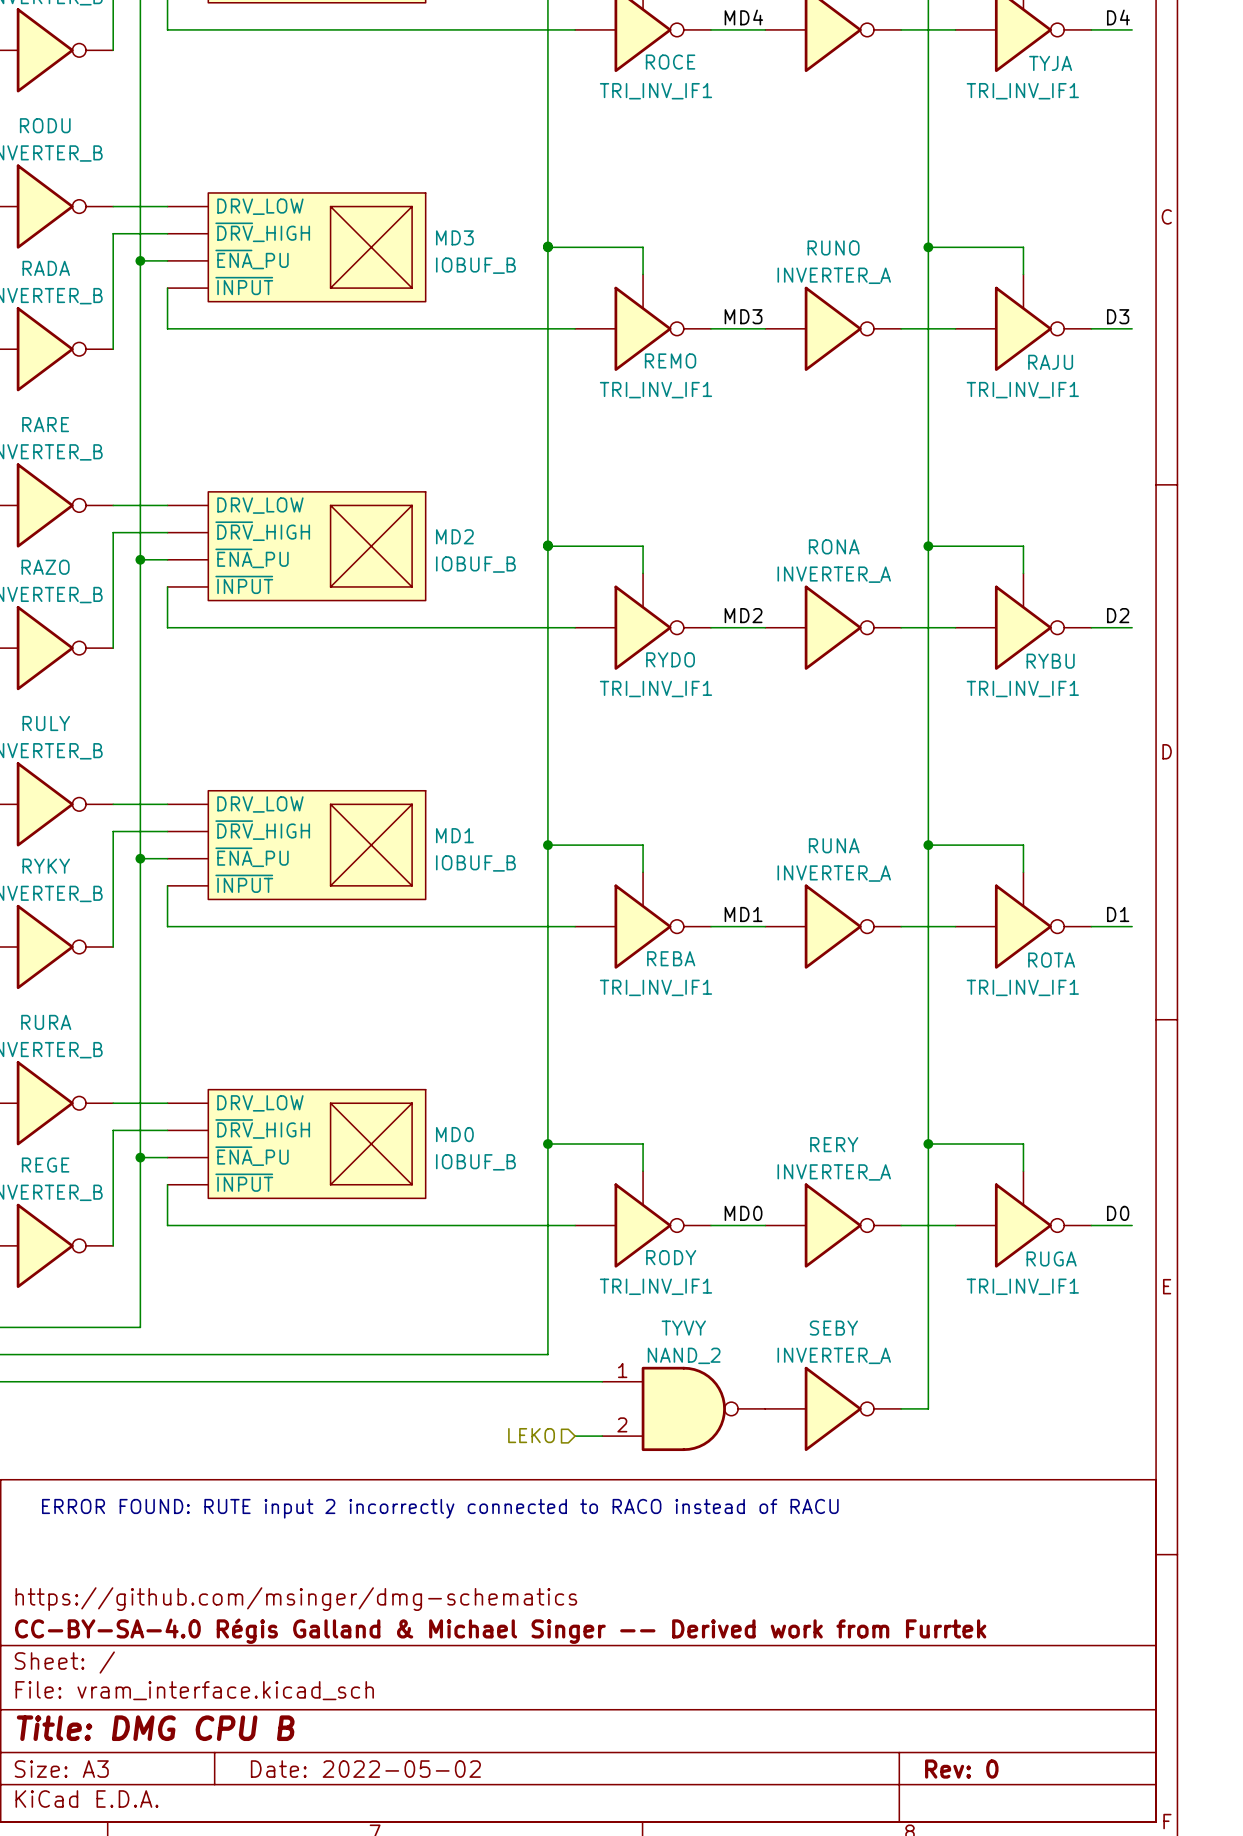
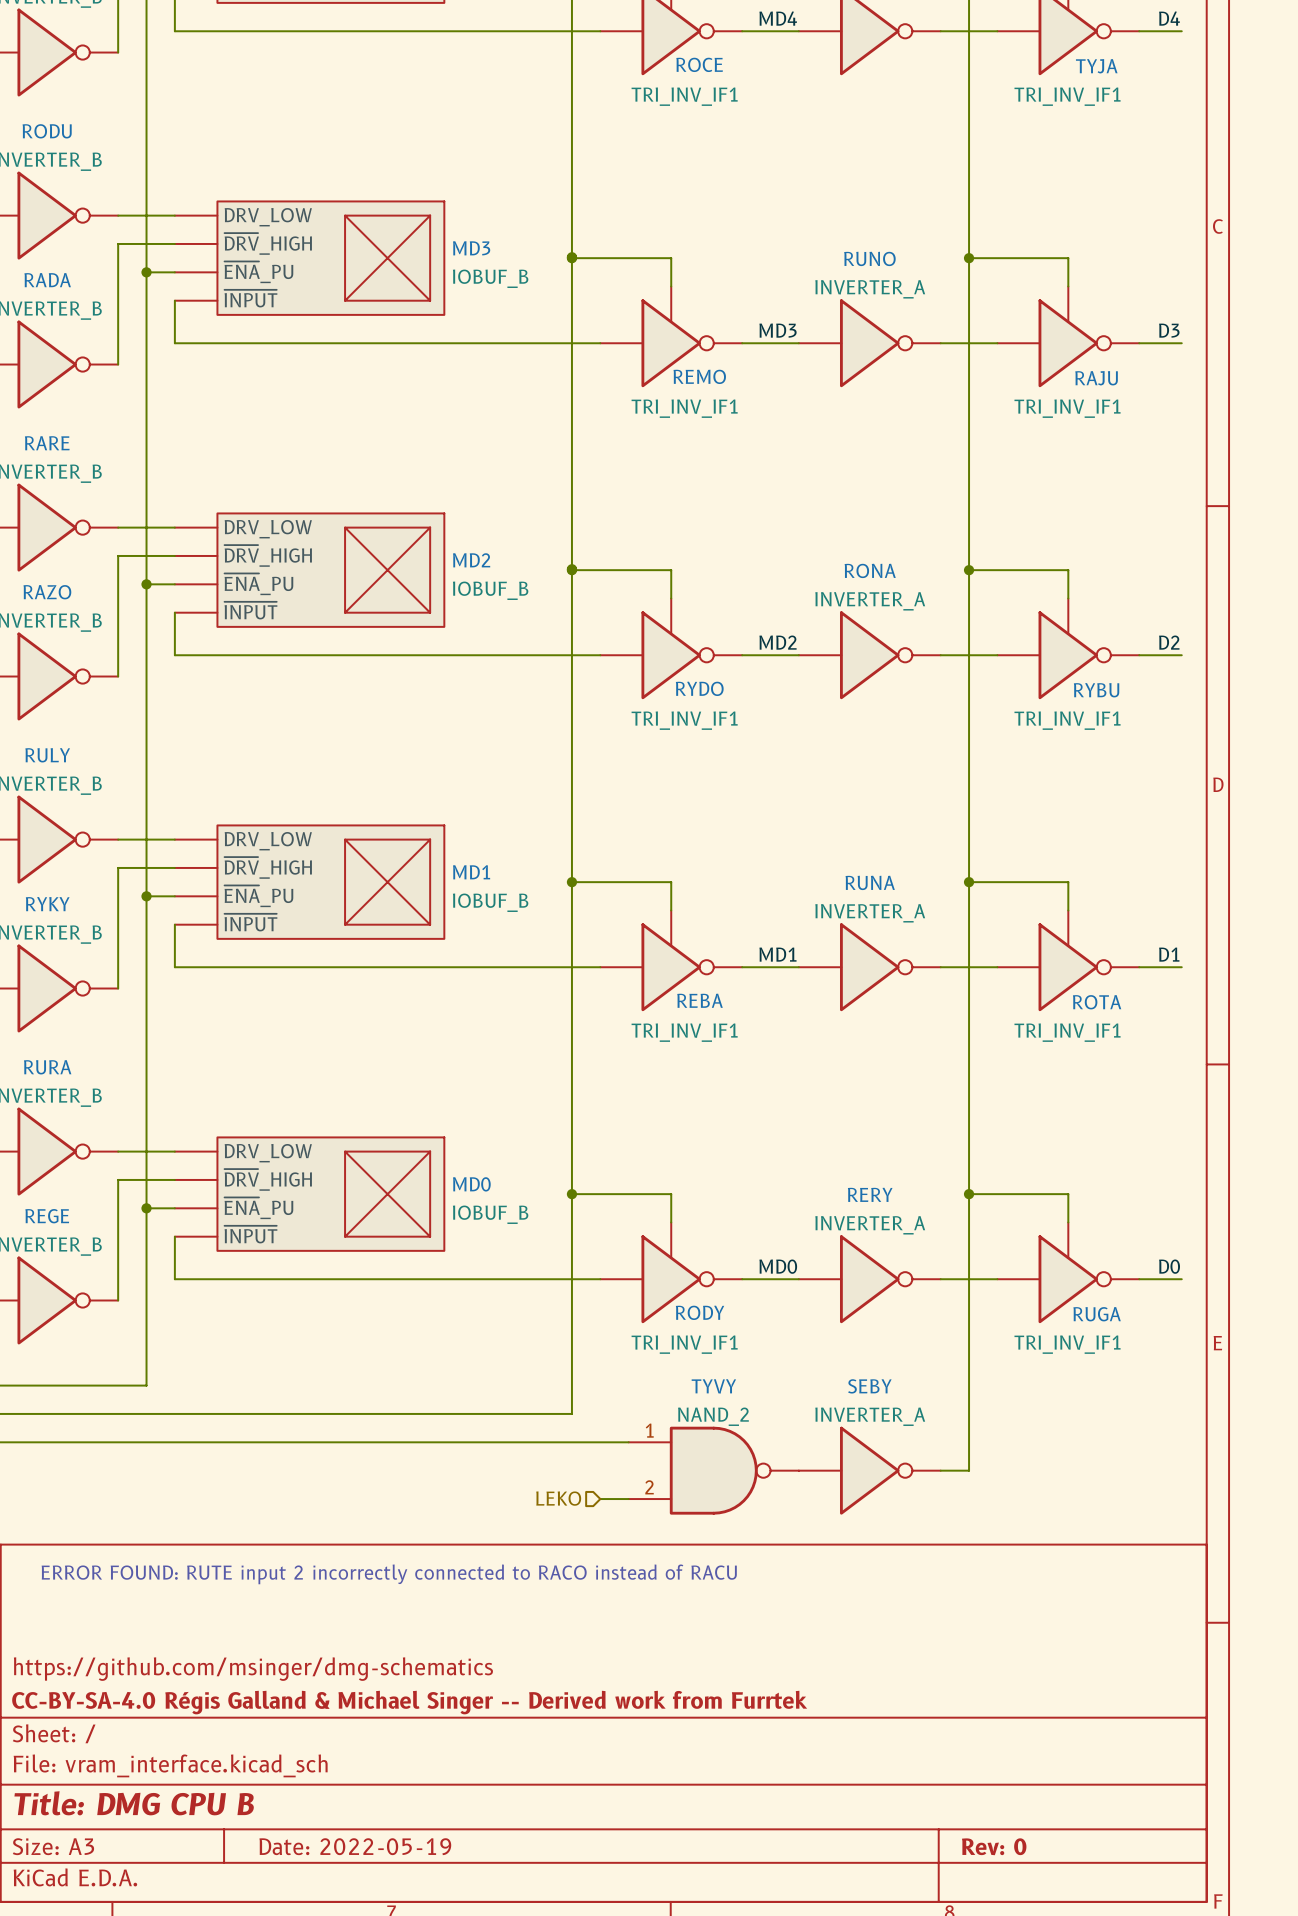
title block: Date: 2022-05-02 (365, 1769) -> Date: 2022-05-19 (355, 1846)

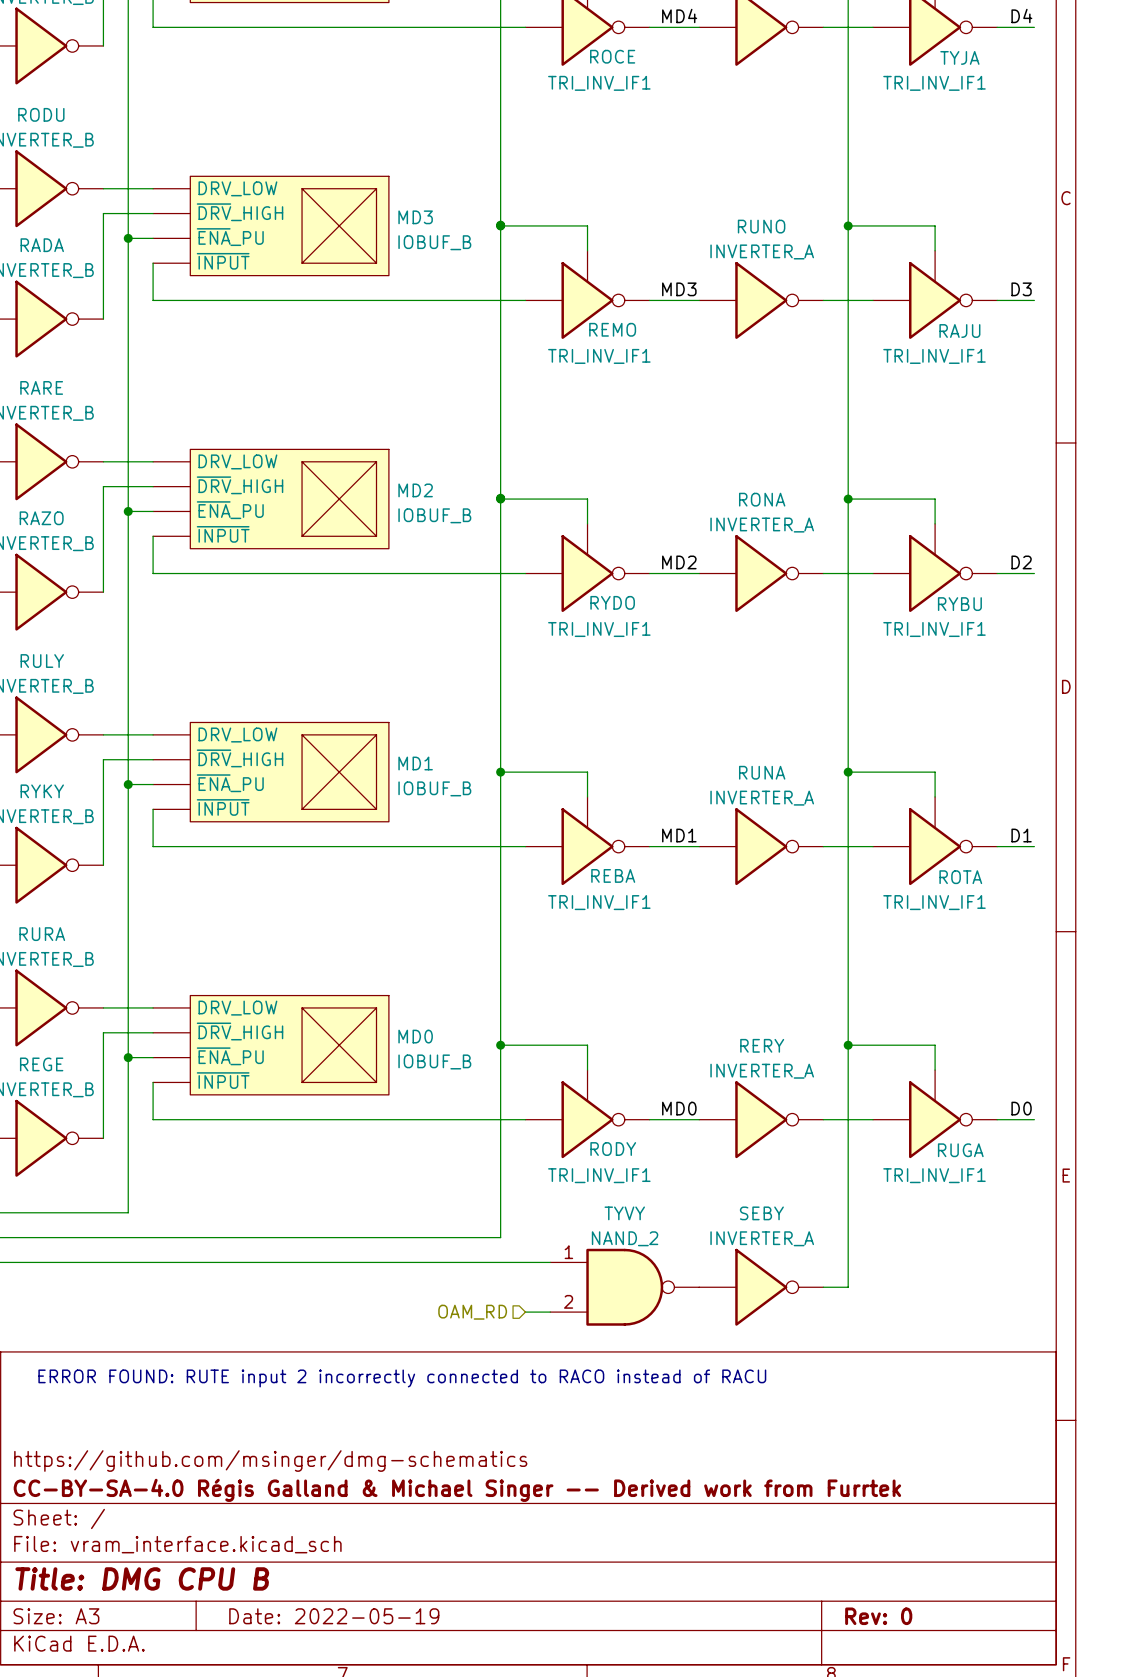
hierarchical label: LEKO (558, 1498) -> OAM_RD (472, 1312)

